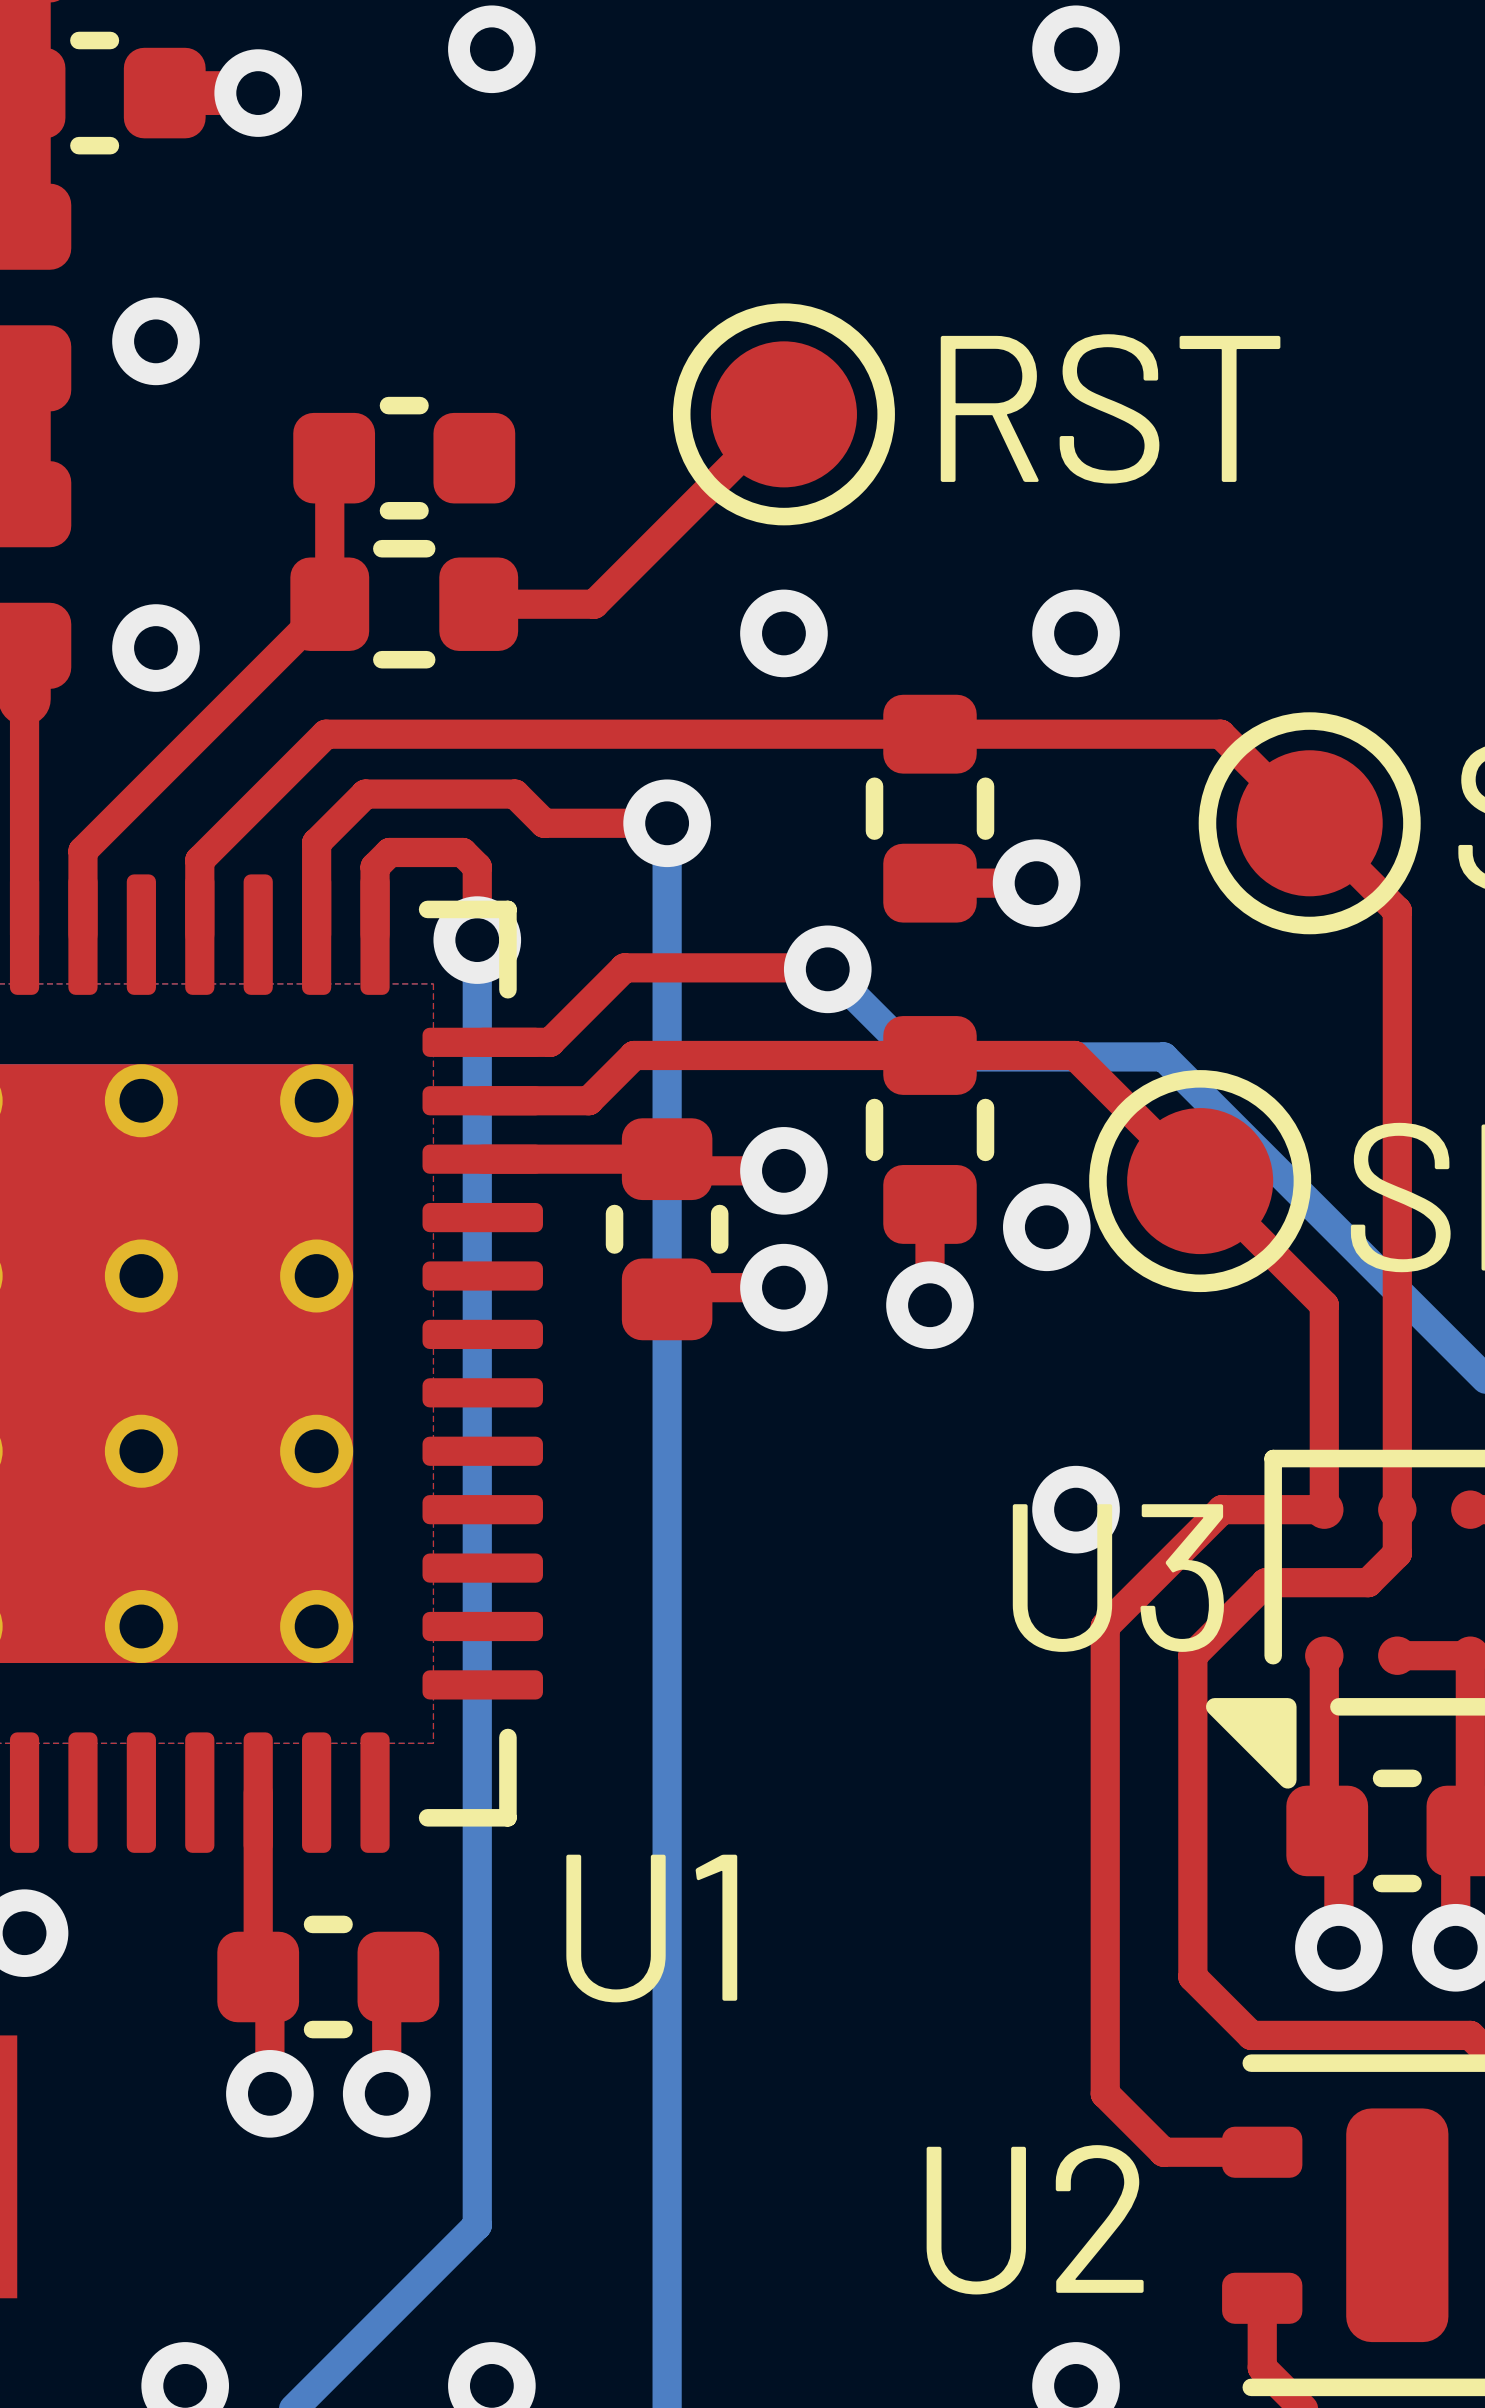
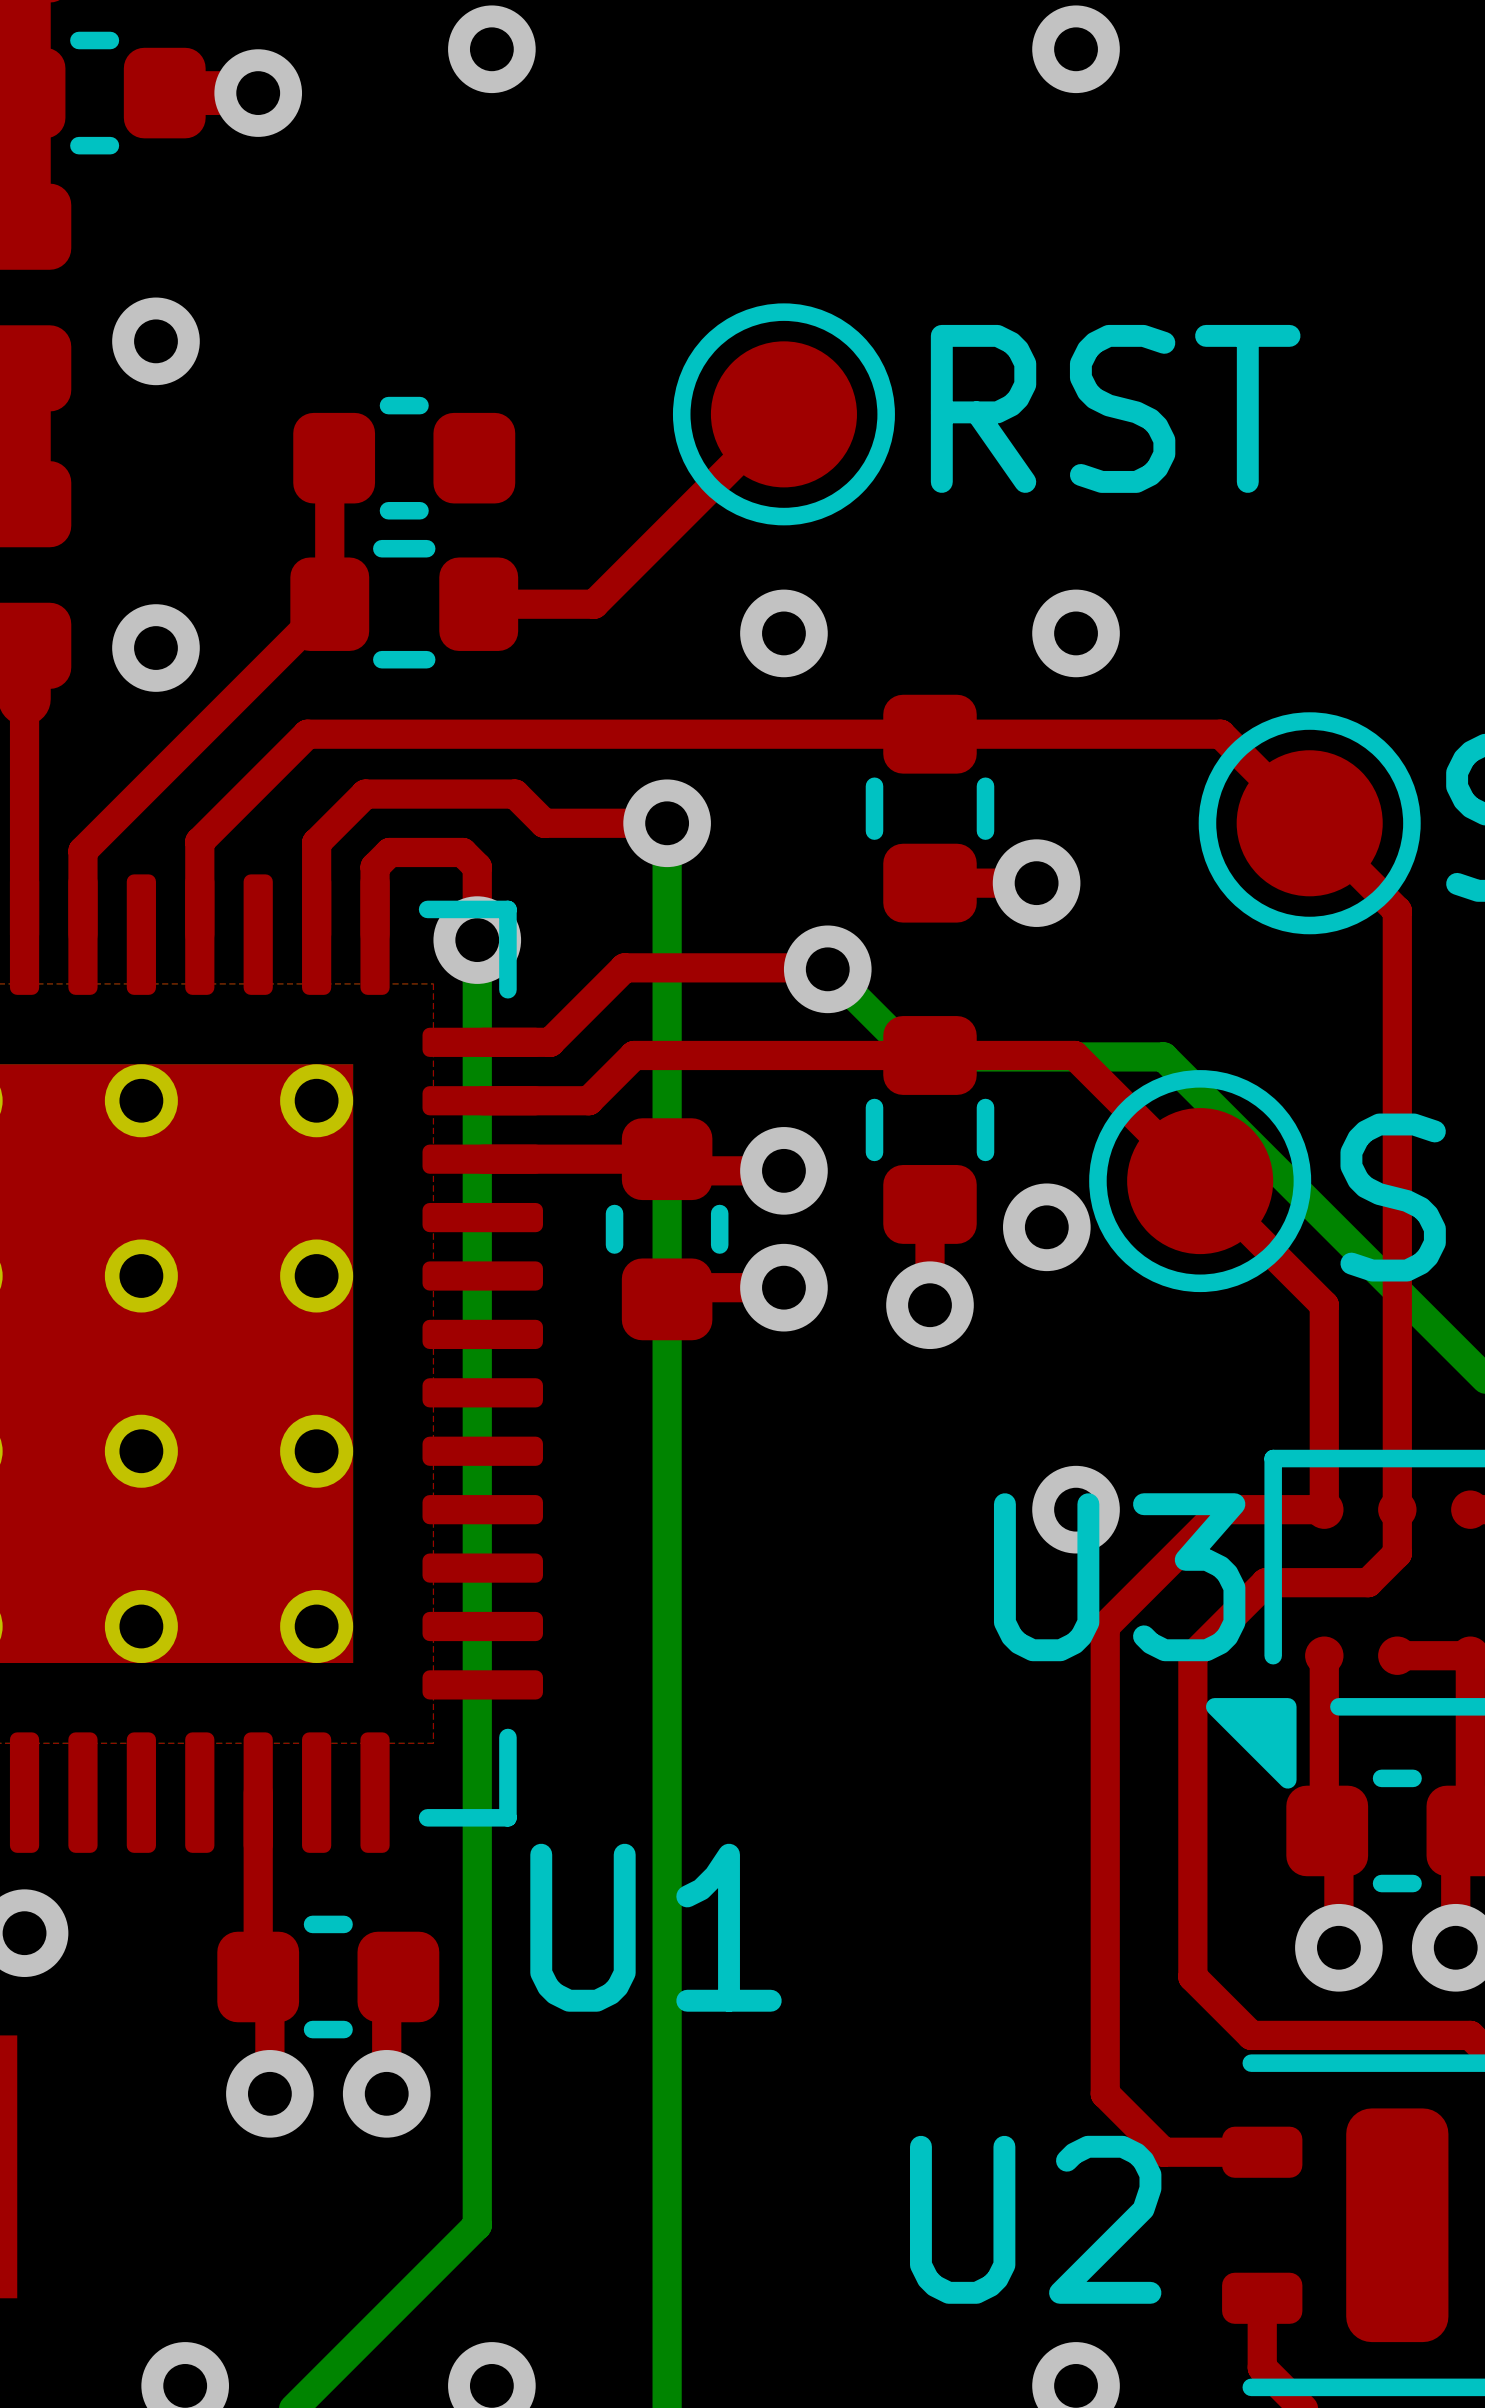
top track: (325, 734) (199, 860) -> (325, 734) (307, 734) (199, 841) (199, 860)

